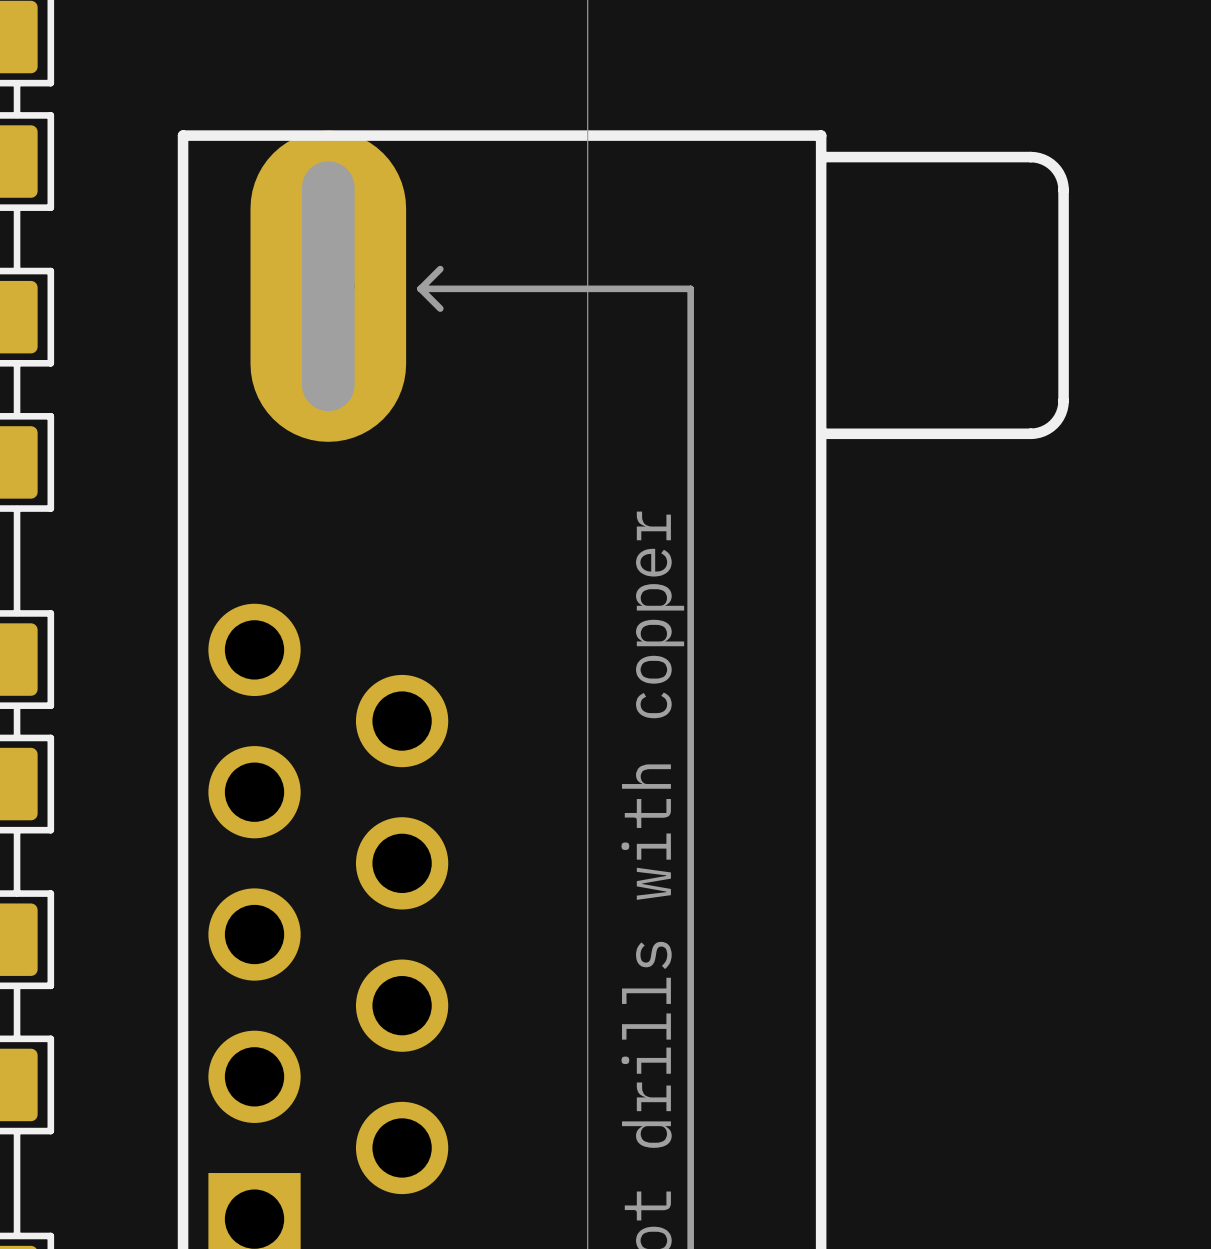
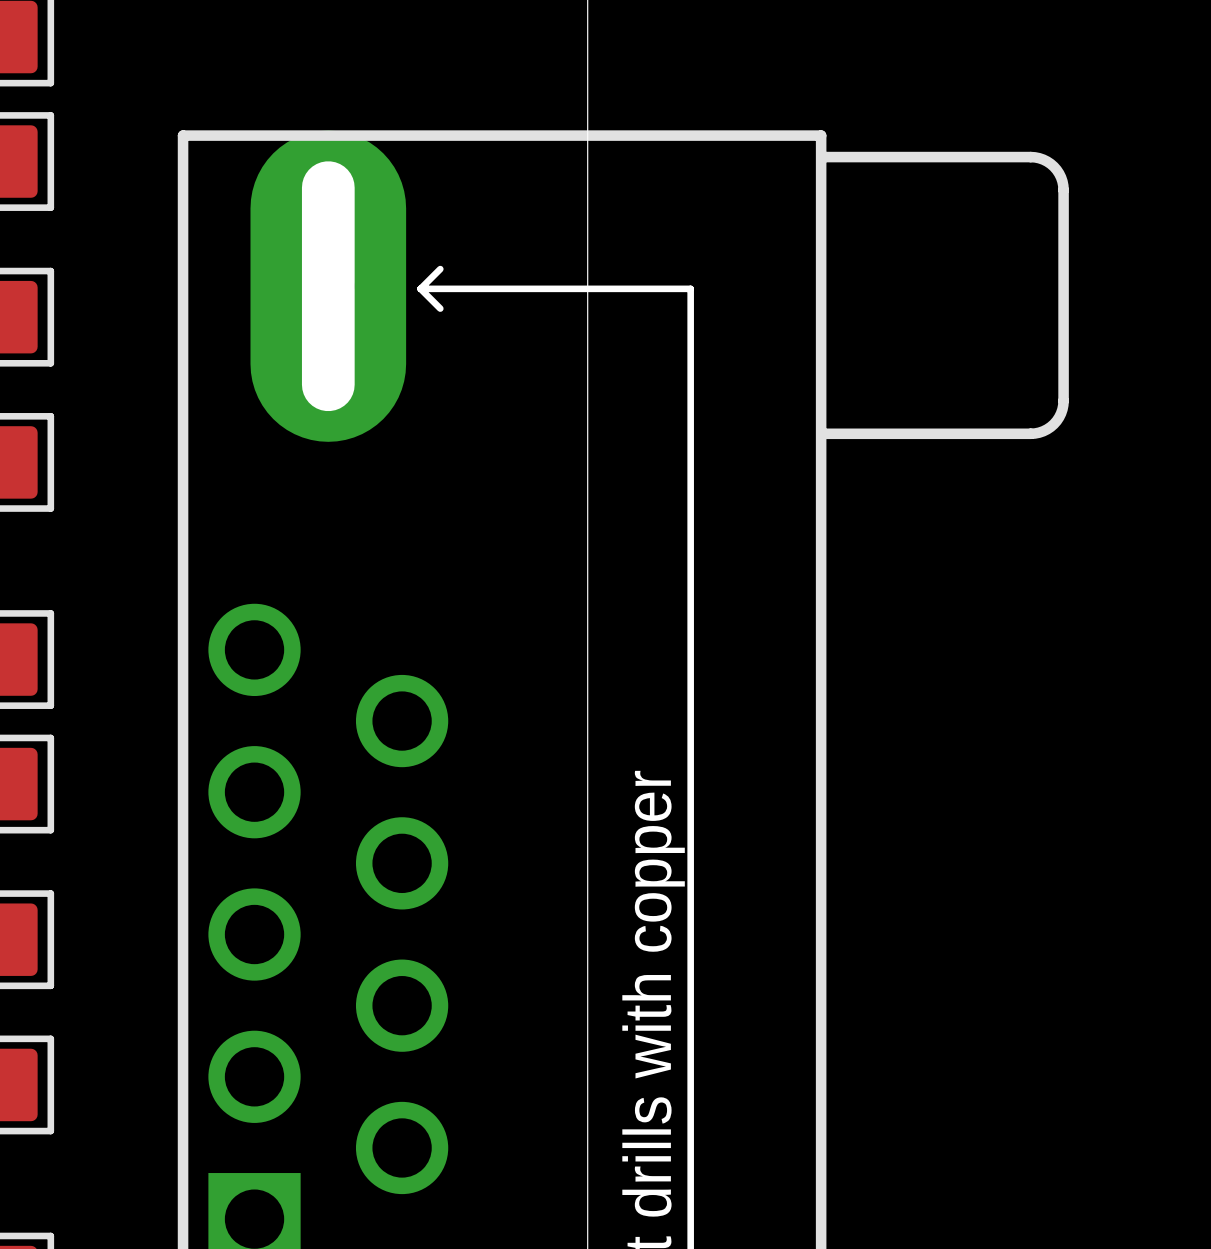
line: (17, 83) (17, 114) -> none
line: (17, 208) (17, 270) -> none
line: (17, 363) (17, 415) -> none
line: (17, 509) (17, 612) -> none
line: (17, 706) (17, 737) -> none
line: (17, 830) (17, 893) -> none
line: (17, 986) (17, 1038) -> none
line: (17, 1131) (17, 1235) -> none

